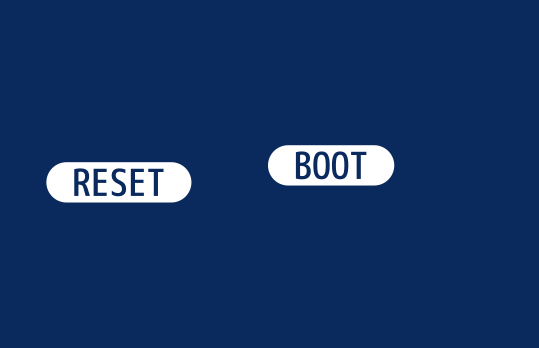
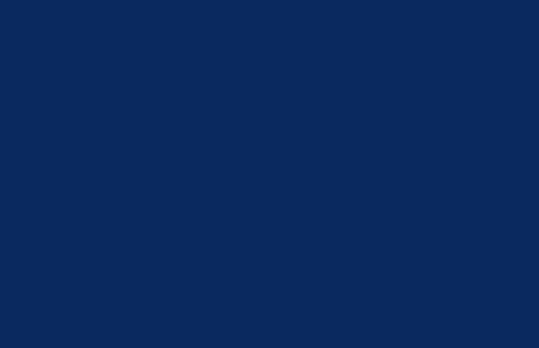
drawing: [268, 145, 395, 186] -> none
drawing: [46, 162, 192, 203] -> none

